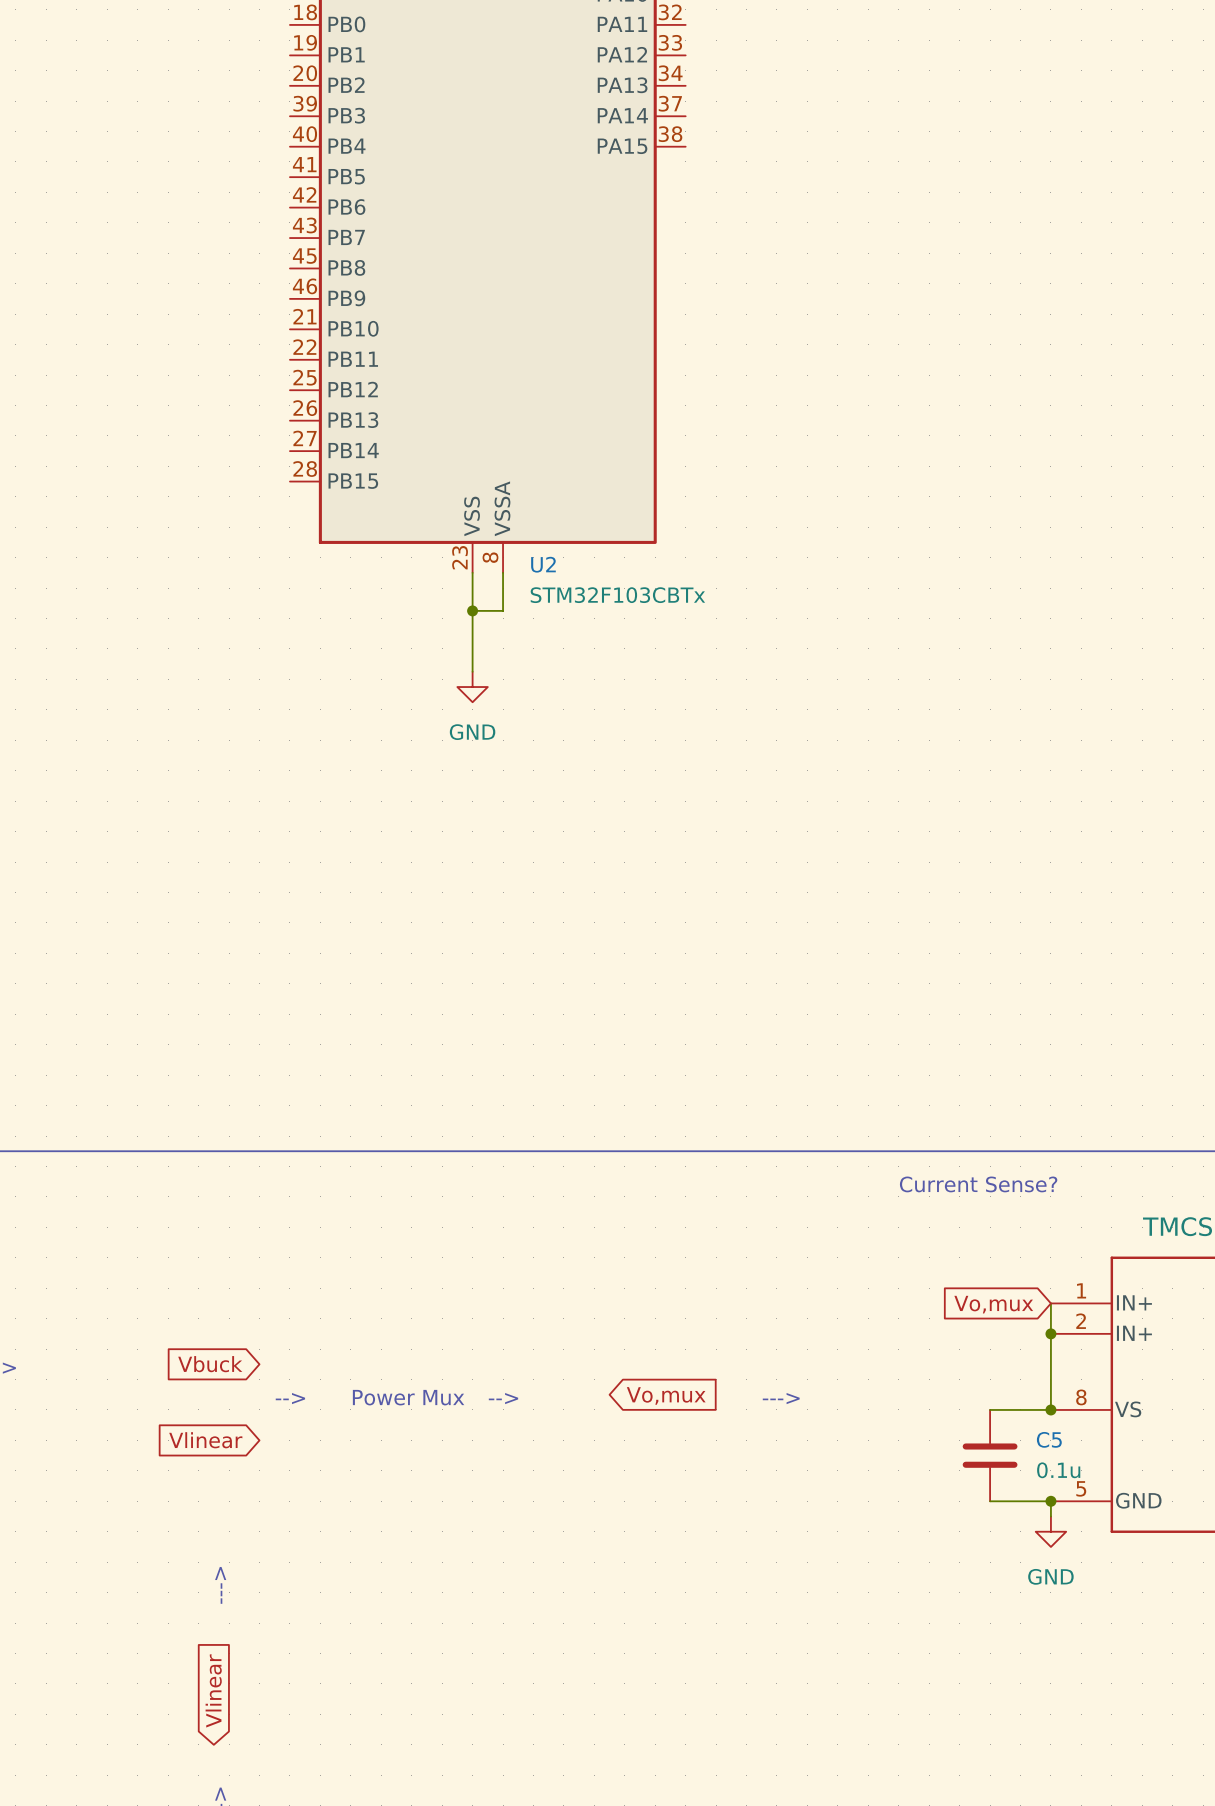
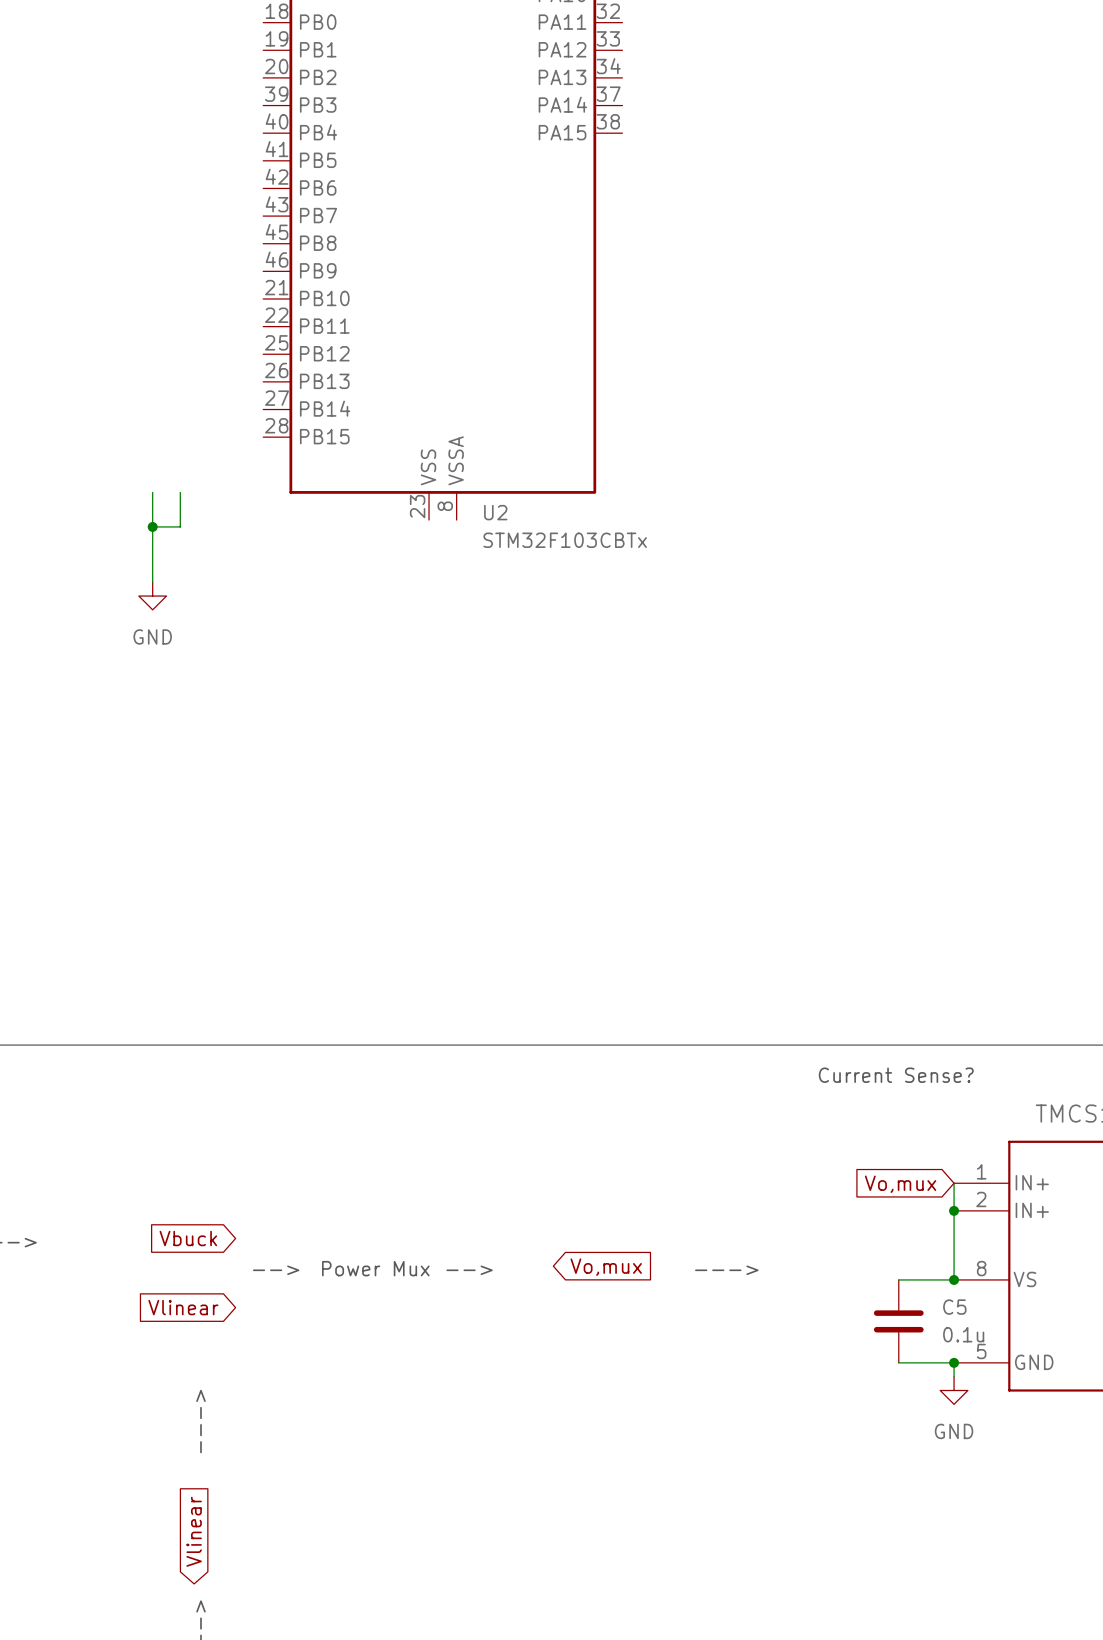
wire: none -> (152, 492) (152, 582)
wire: none -> (180, 492) (180, 526) (152, 526)
wire: (472, 572) (472, 671) -> none
wire: (503, 572) (503, 610) (472, 610) -> none
junction: none -> (152, 526)
junction: (472, 610) -> none
power symbol: none -> GND (152, 596)
power symbol: GND (472, 687) -> none

